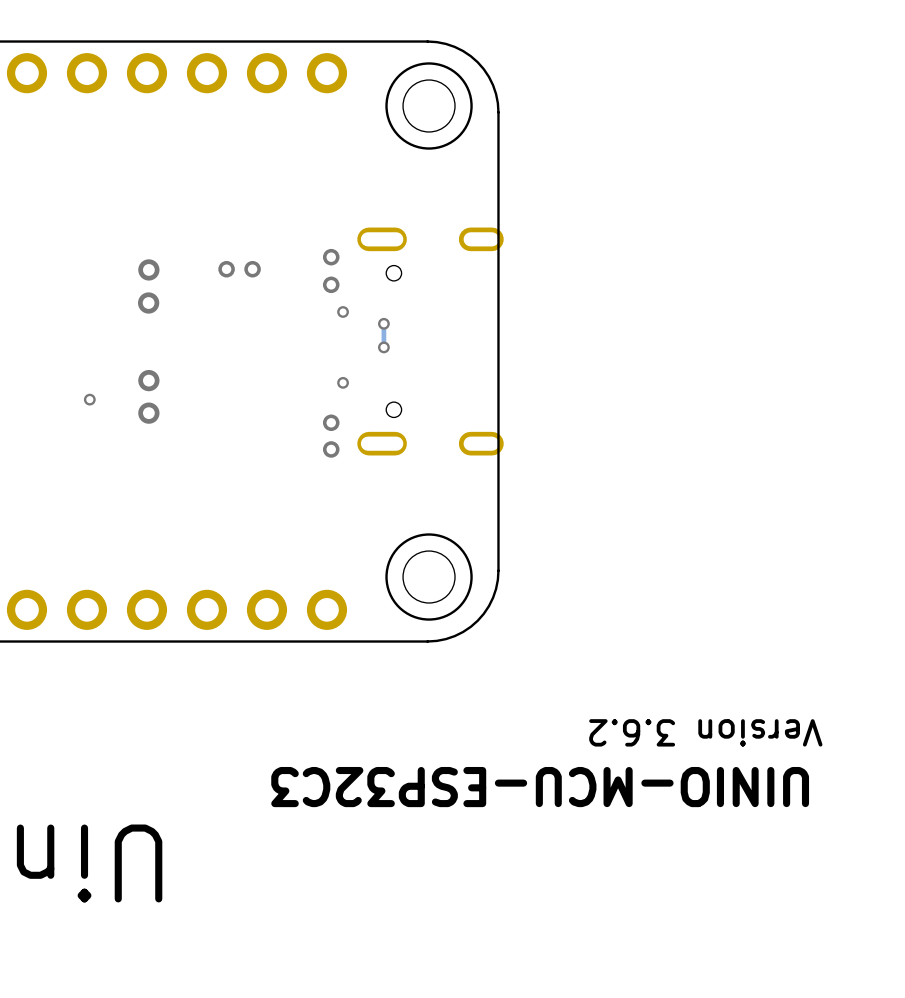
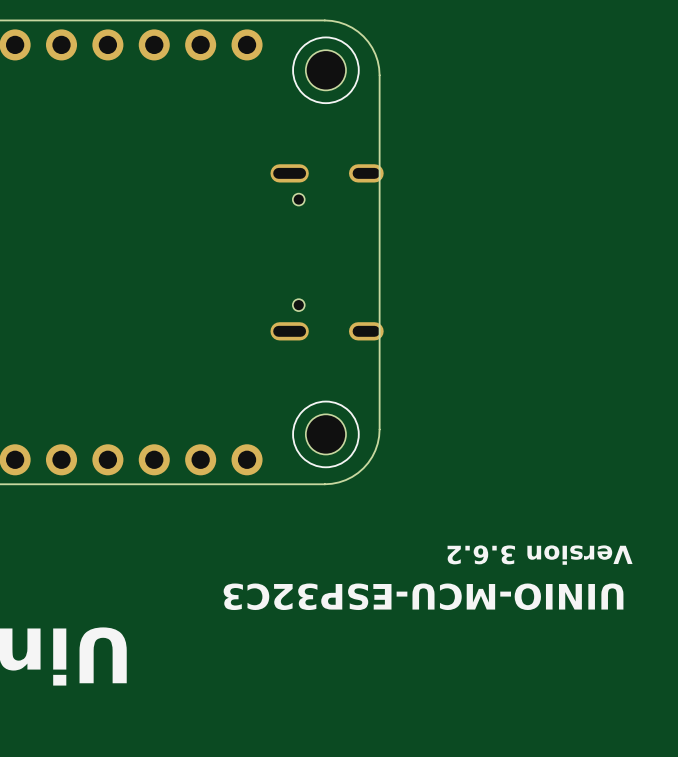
via: (331, 257) -> none
via: (148, 269) -> none
via: (226, 269) -> none
via: (252, 269) -> none
via: (331, 284) -> none
via: (148, 303) -> none
via: (343, 311) -> none
track: (383, 323) (383, 347) -> none
via: (383, 323) -> none
via: (383, 347) -> none
via: (148, 380) -> none
via: (343, 382) -> none
via: (89, 399) -> none
via: (148, 413) -> none
via: (331, 422) -> none
via: (331, 449) -> none

